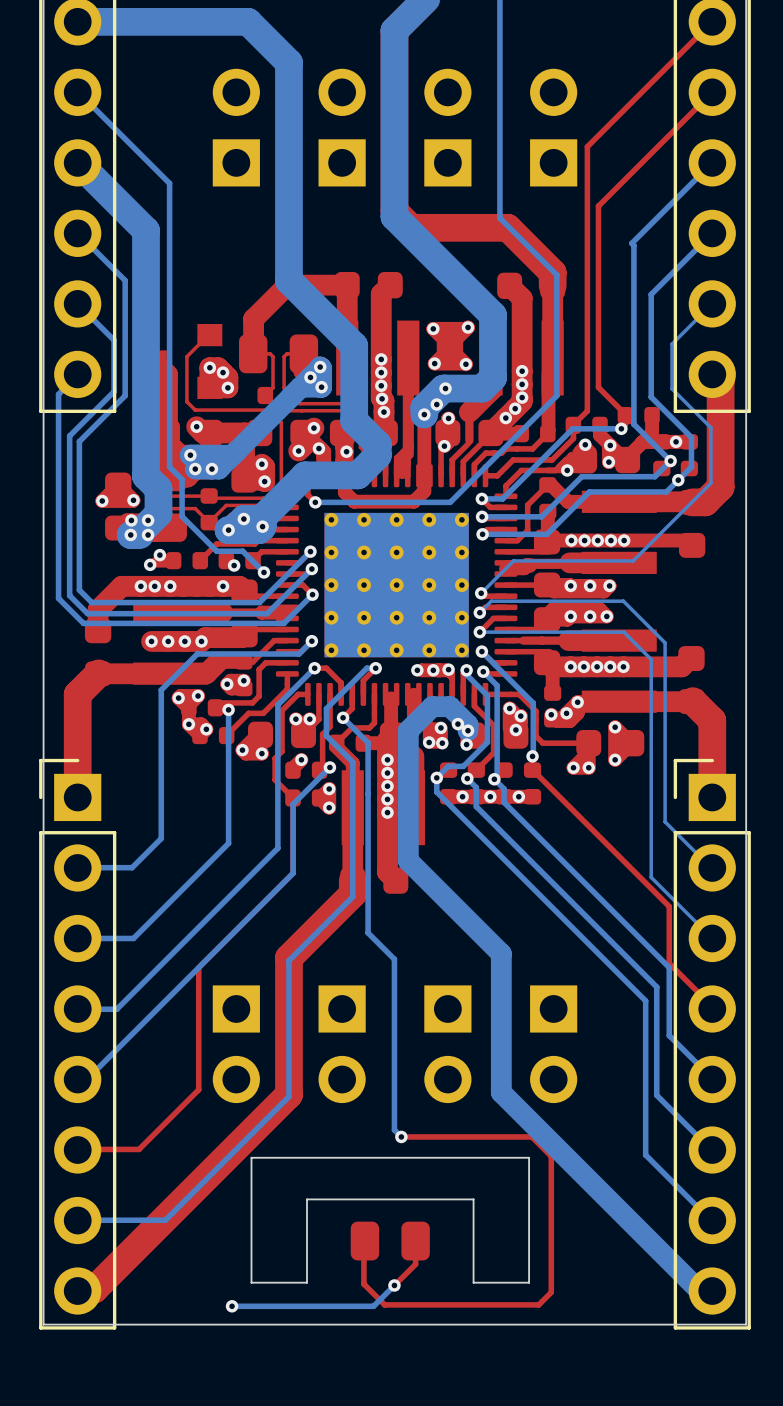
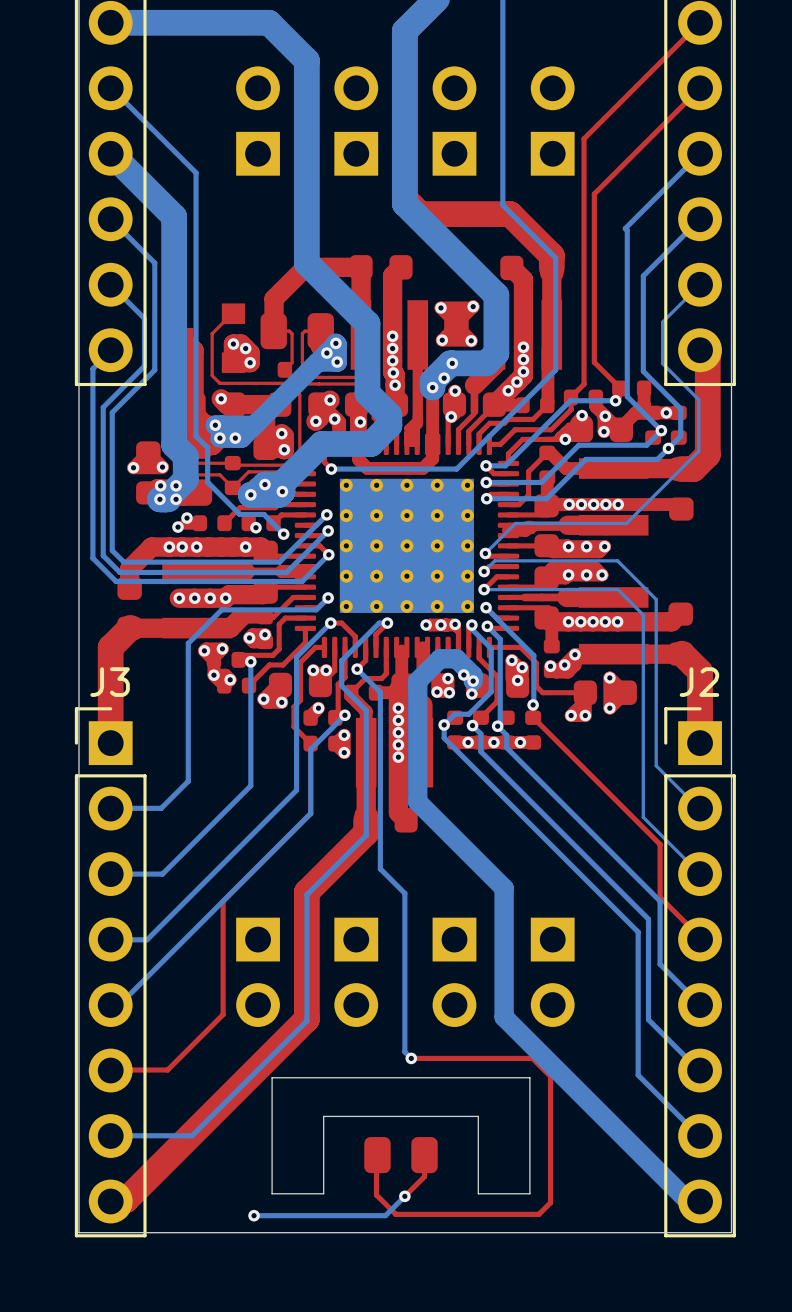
J3 name: none -> J3 (110, 682)
J2 name: none -> J2 (699, 682)

